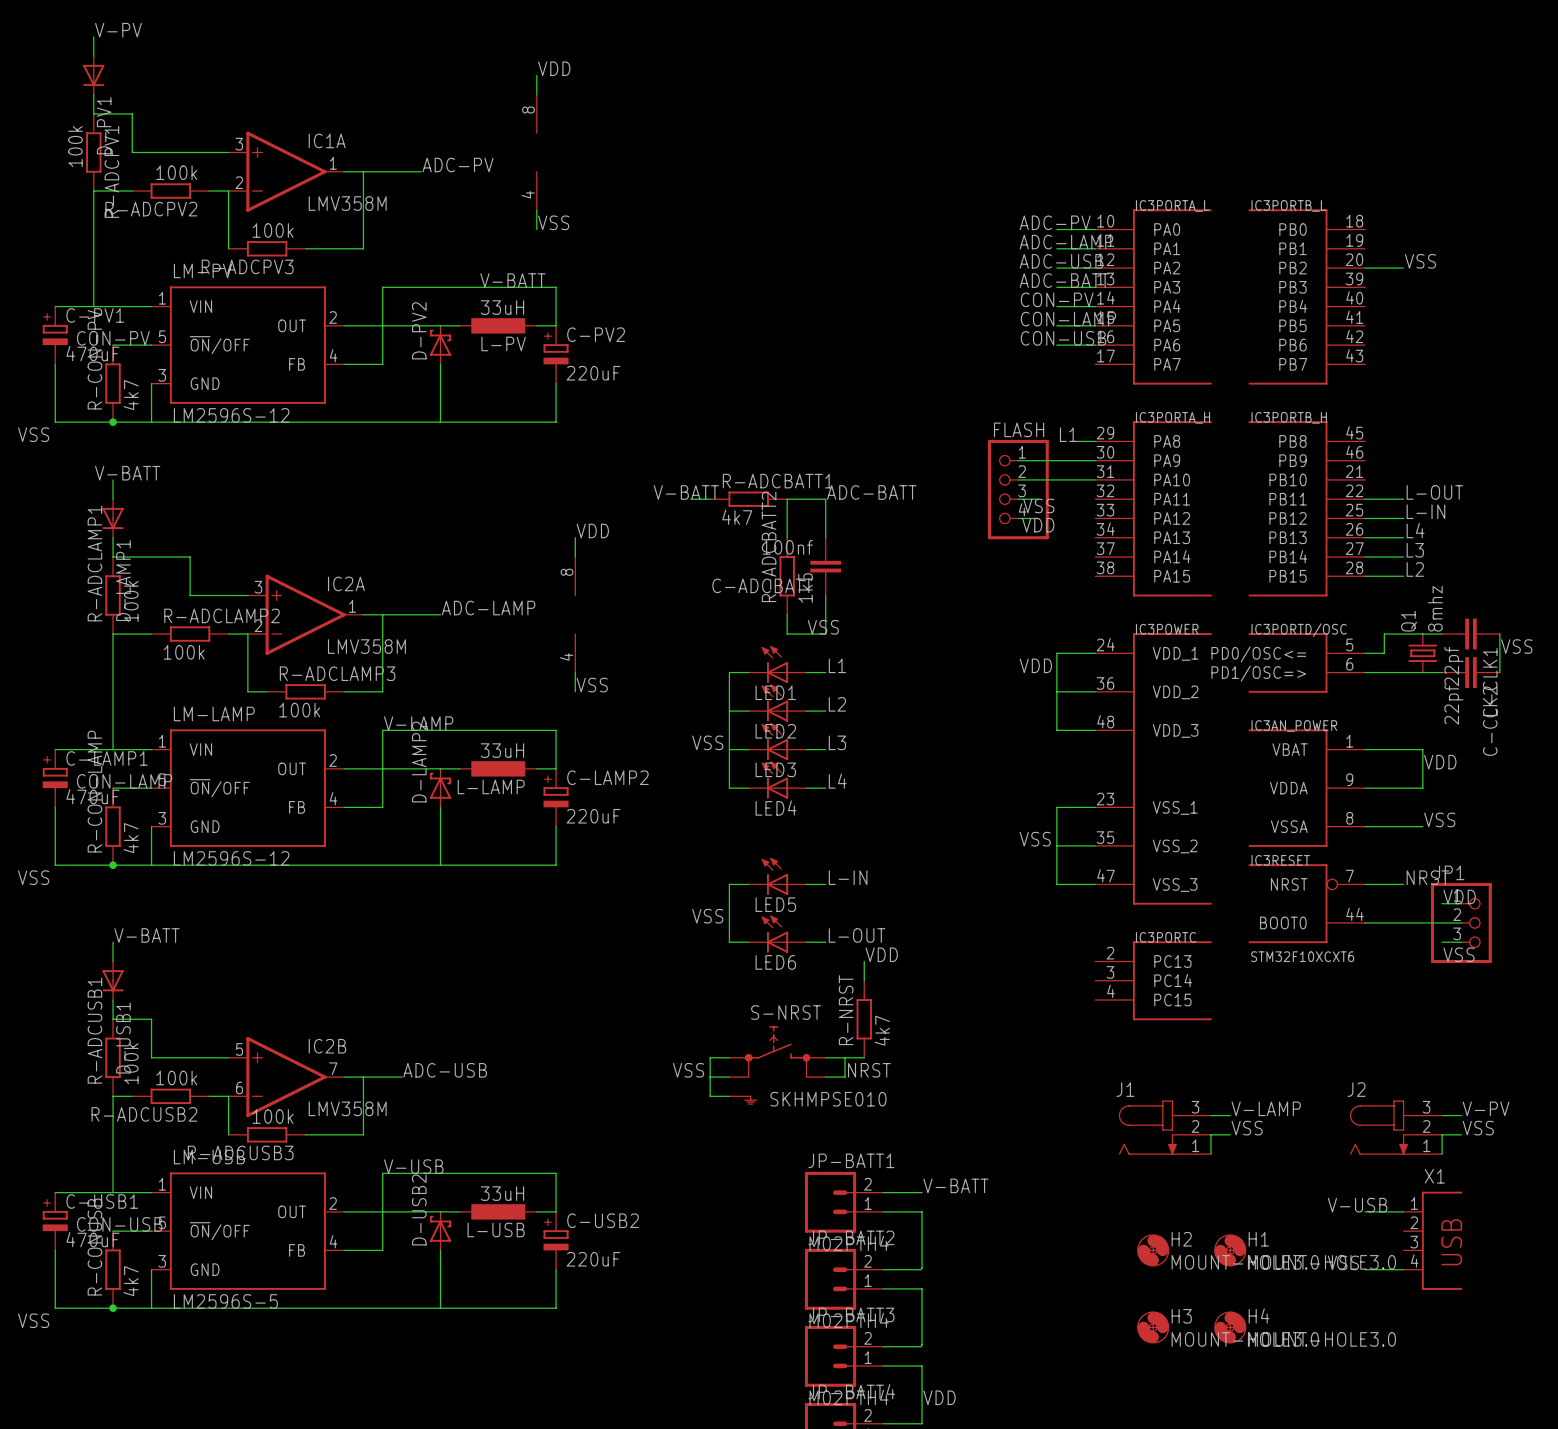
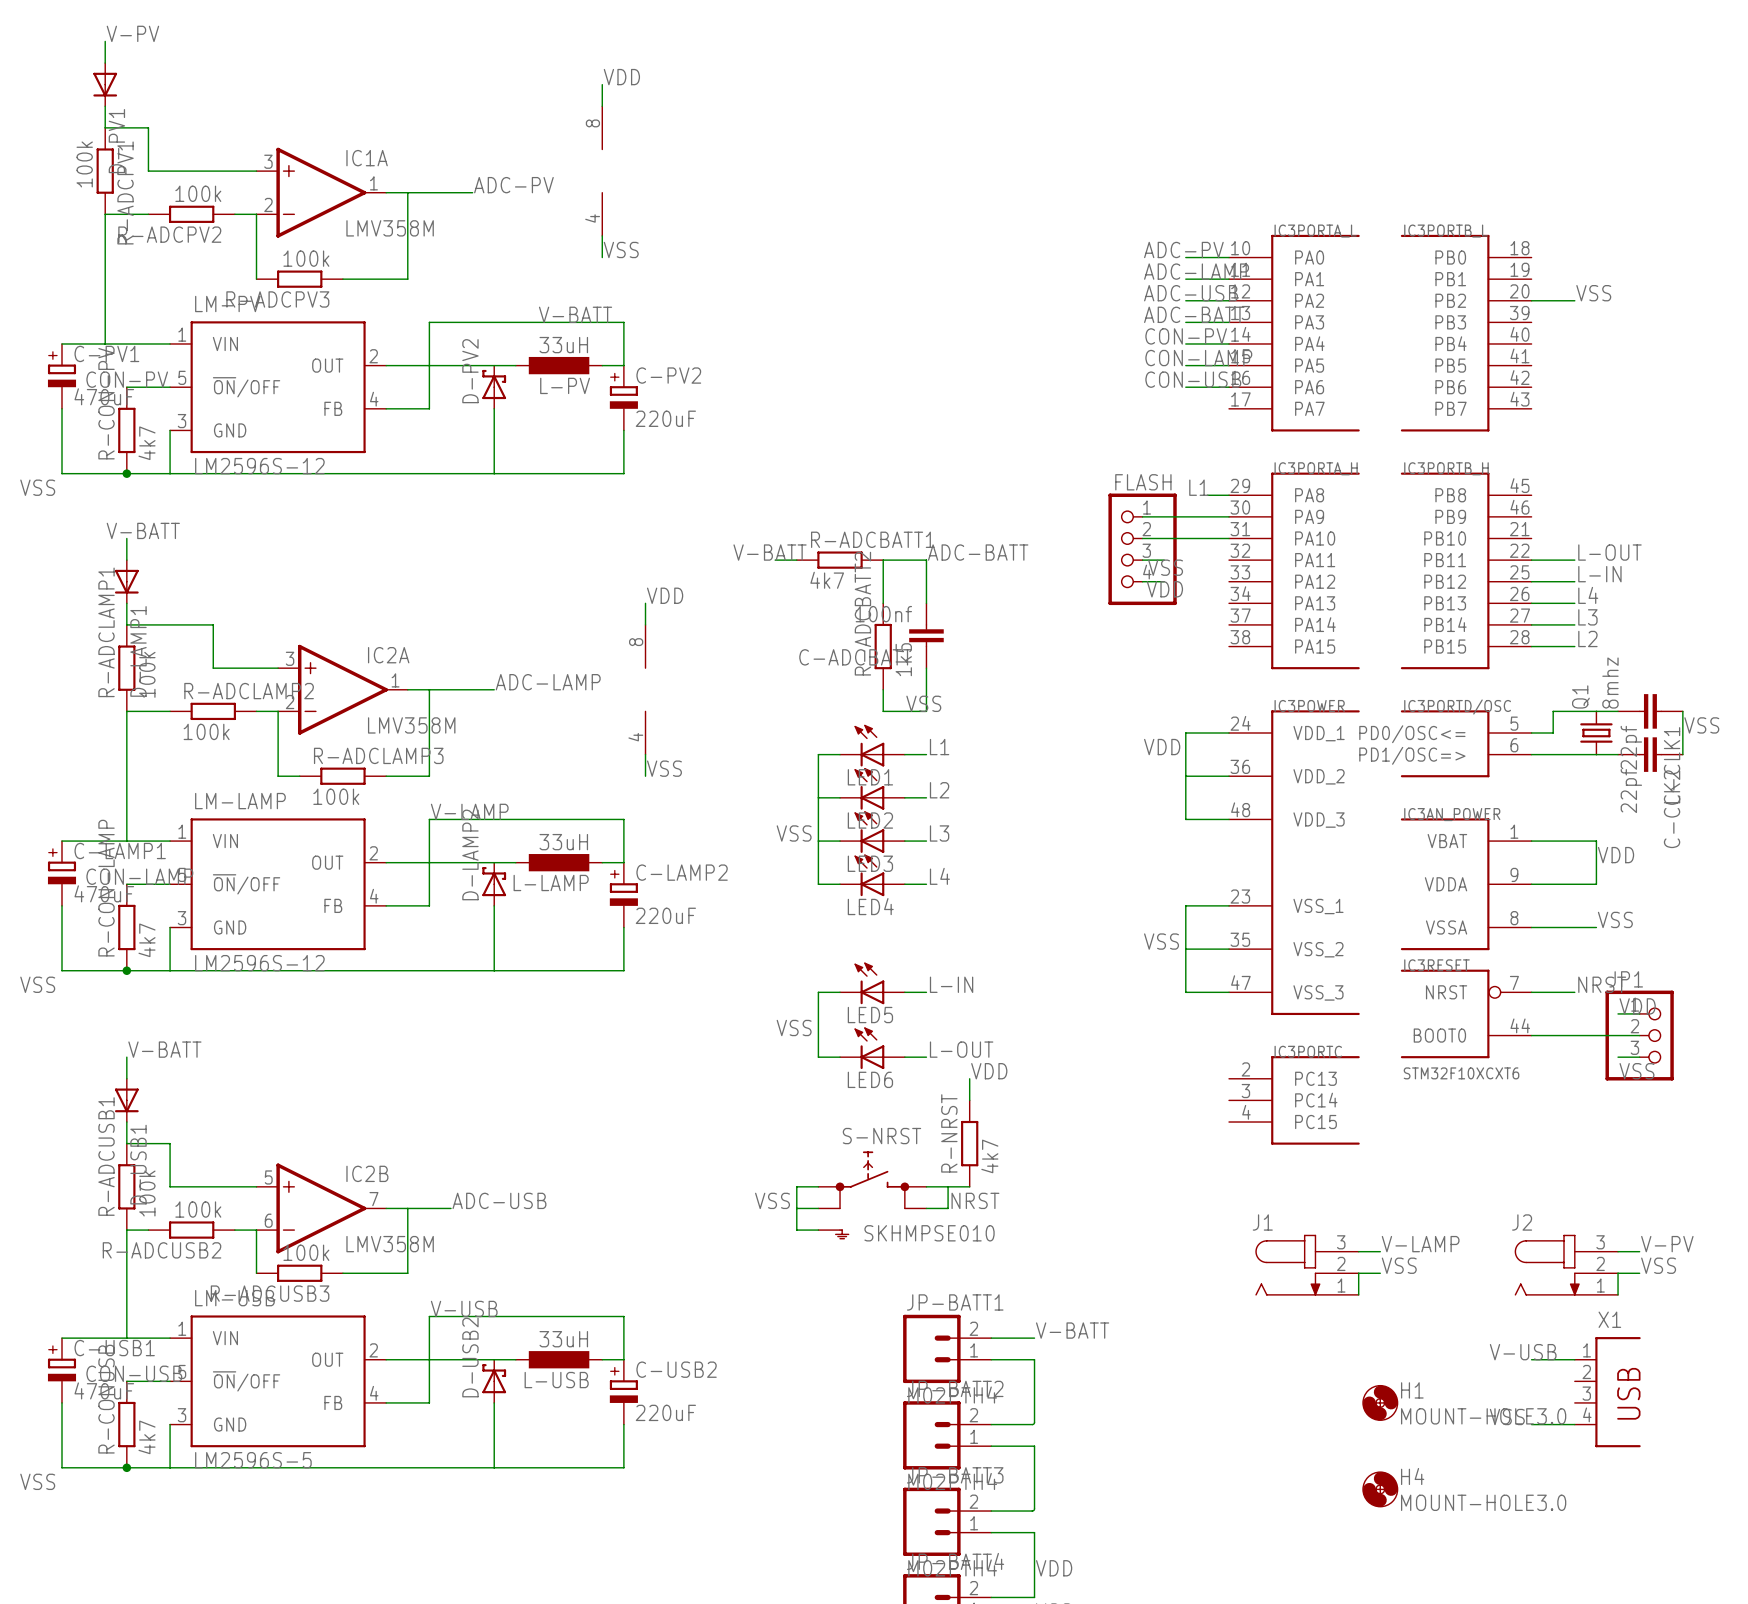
H2: MOUNT-HOLE3.0 (1153, 1250) -> none
H3: MOUNT-HOLE3.0 (1153, 1327) -> none

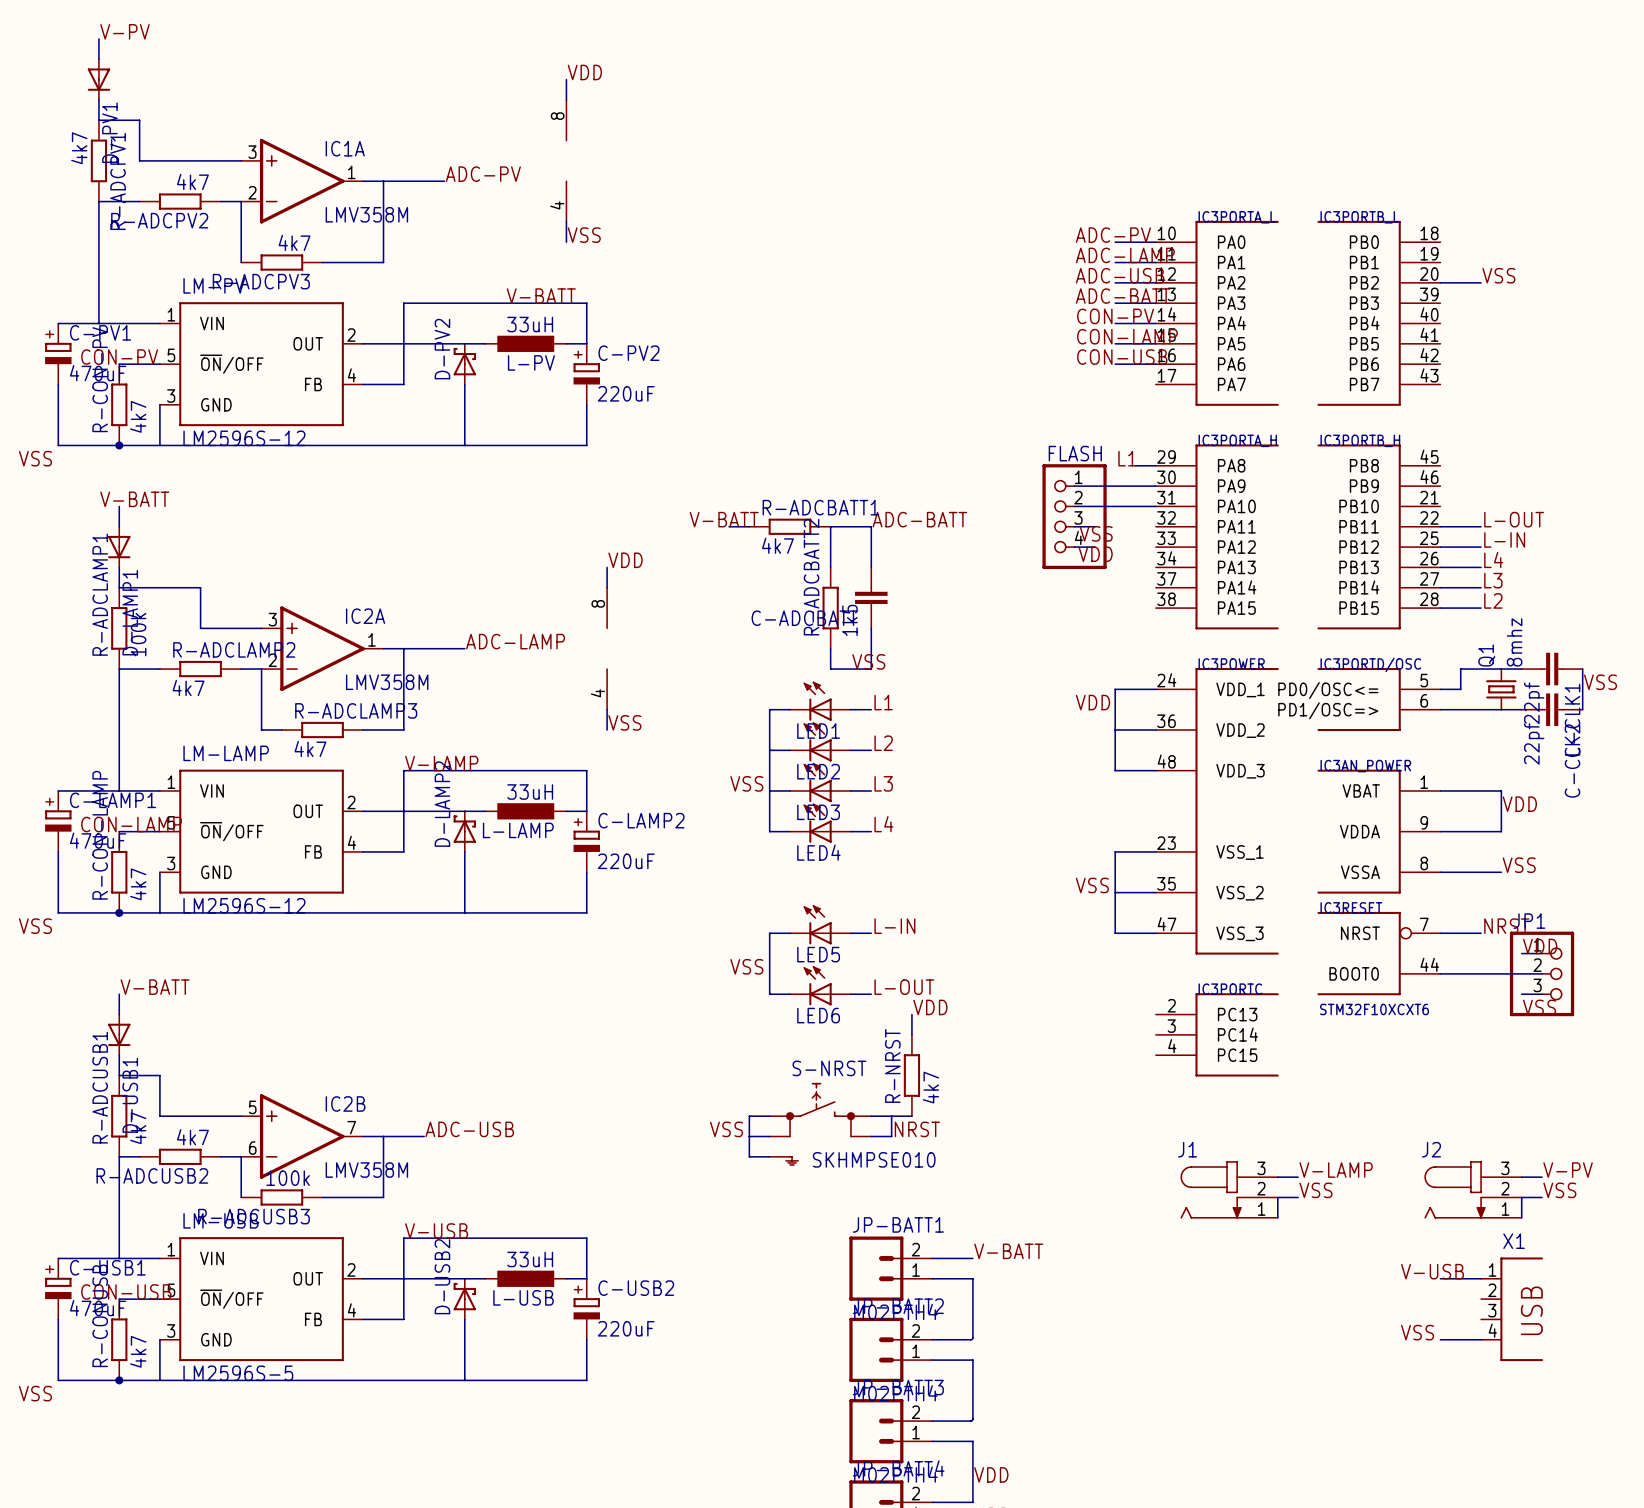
R-ADCPV1 value: 100k (84, 164) -> 4k7 (79, 148)
R-ADCPV2 value: 100k (198, 193) -> 4k7 (192, 181)
R-ADCPV3 value: 100k (306, 258) -> 4k7 (294, 242)
C-ADCBATT value: 100nf (883, 614) -> none
R-ADCLAMP2 value: 100k (206, 731) -> 4k7 (188, 688)
R-ADCLAMP3 value: 100k (336, 796) -> 4k7 (310, 748)
R-ADCUSB1 value: 100k (147, 1193) -> 4k7 (138, 1128)
R-ADCUSB2 value: 100k (198, 1209) -> 4k7 (192, 1137)
H1: MOUNT-HOLE3.0 (1380, 1402) -> none
H4: MOUNT-HOLE3.0 (1380, 1489) -> none

